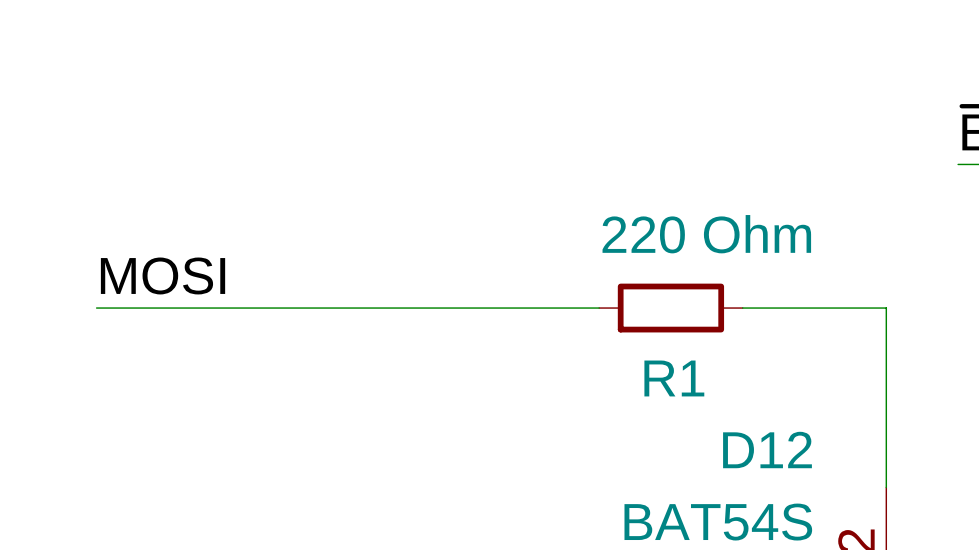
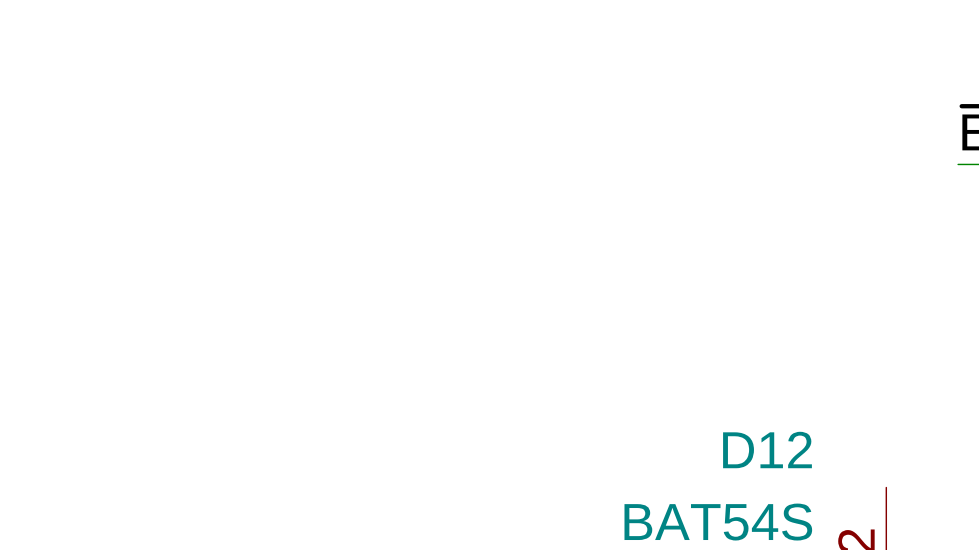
label: MOSI (163, 275) -> none
wire: (96, 308) (599, 308) -> none
R1: 220 Ohm (670, 308) -> none
wire: (742, 308) (886, 308) (886, 487) -> none

